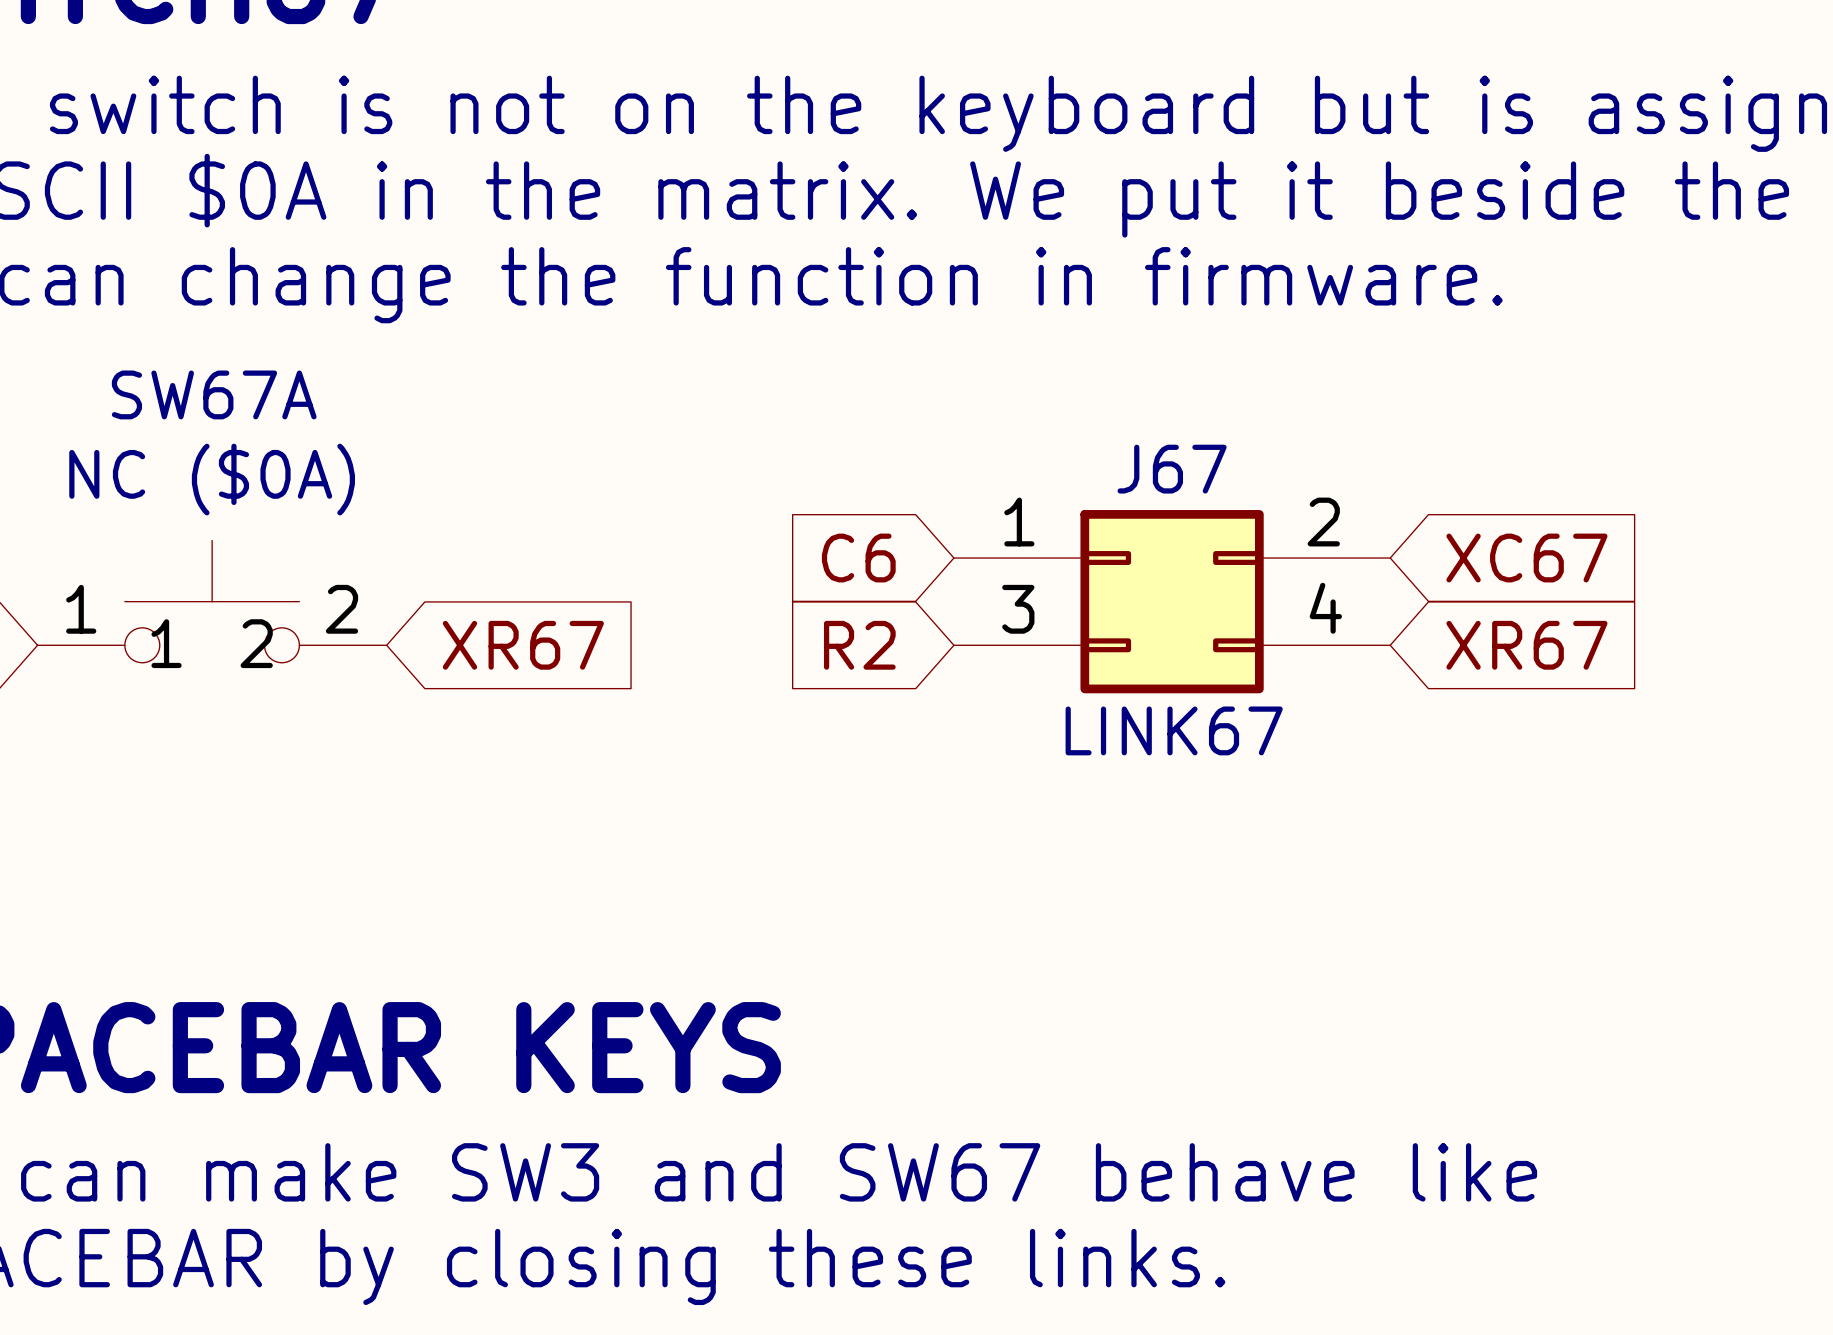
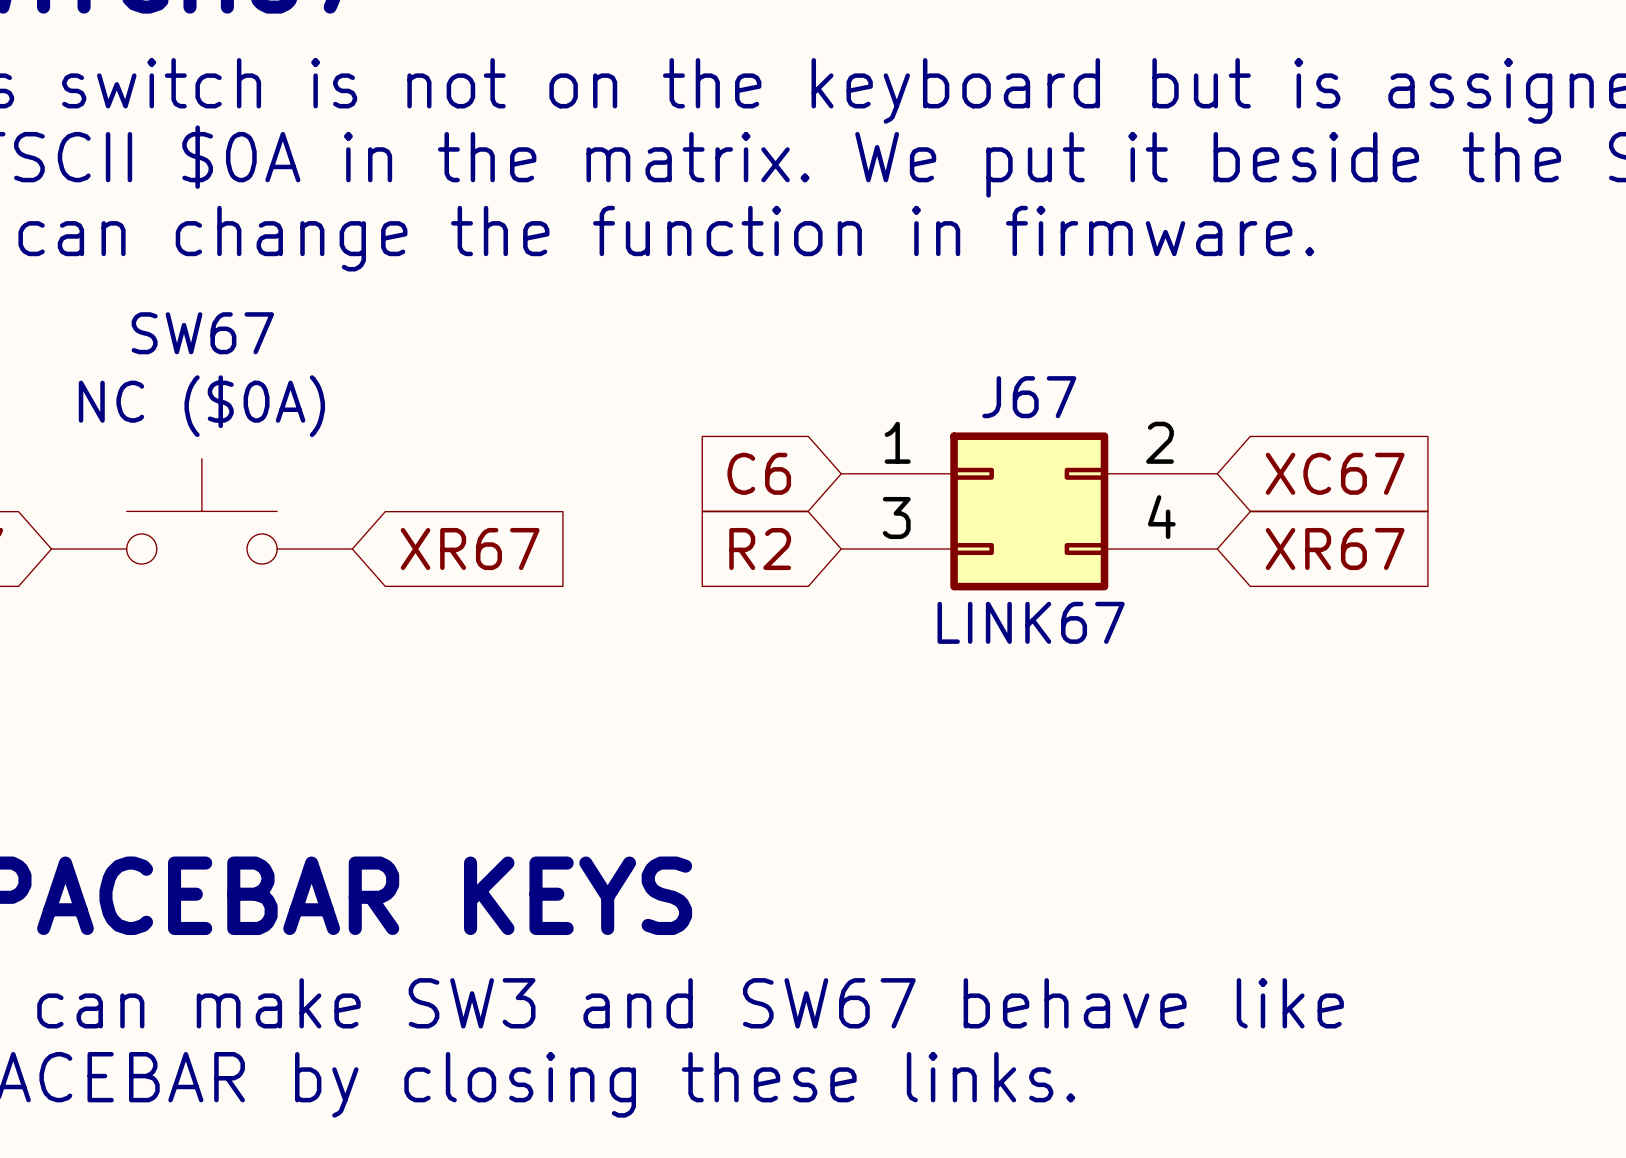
SW67A name: SW67A (214, 394) -> SW67 (202, 333)
SW67A pin number: 1 (81, 609) -> none
SW67A pin number: 2 (341, 609) -> none
SW67A pin name: 1 (166, 643) -> none
SW67A pin name: 2 (256, 643) -> none

